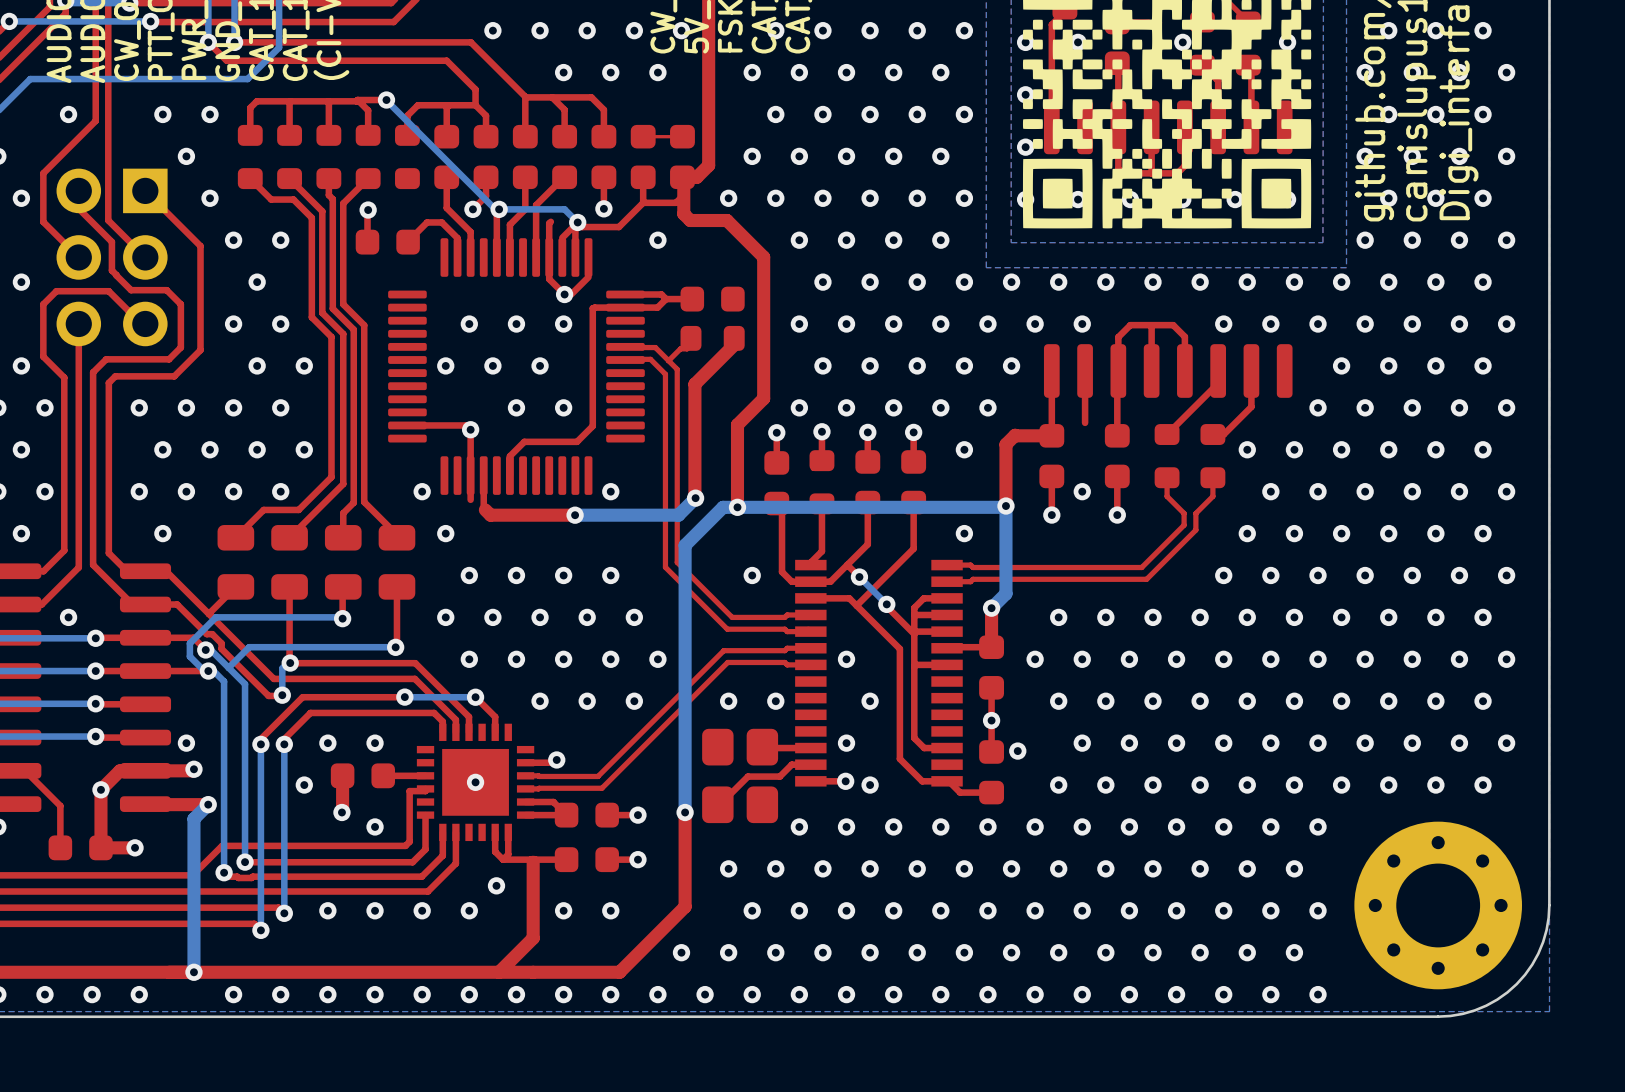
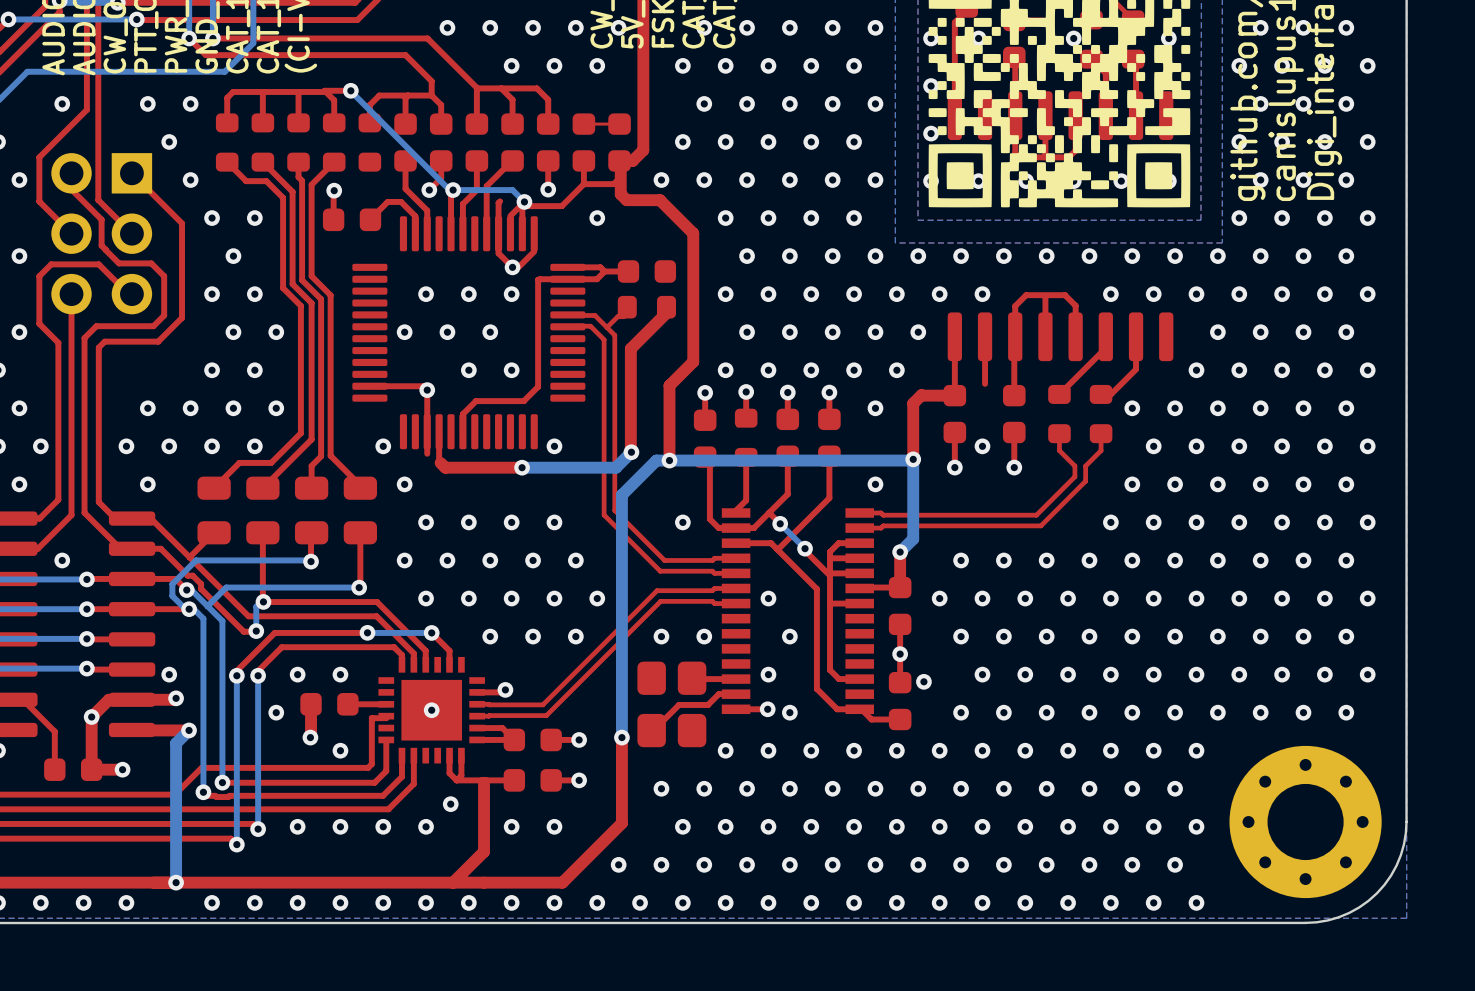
via: (44, 407) -> none
via: (139, 407) -> none
via: (186, 407) -> none

